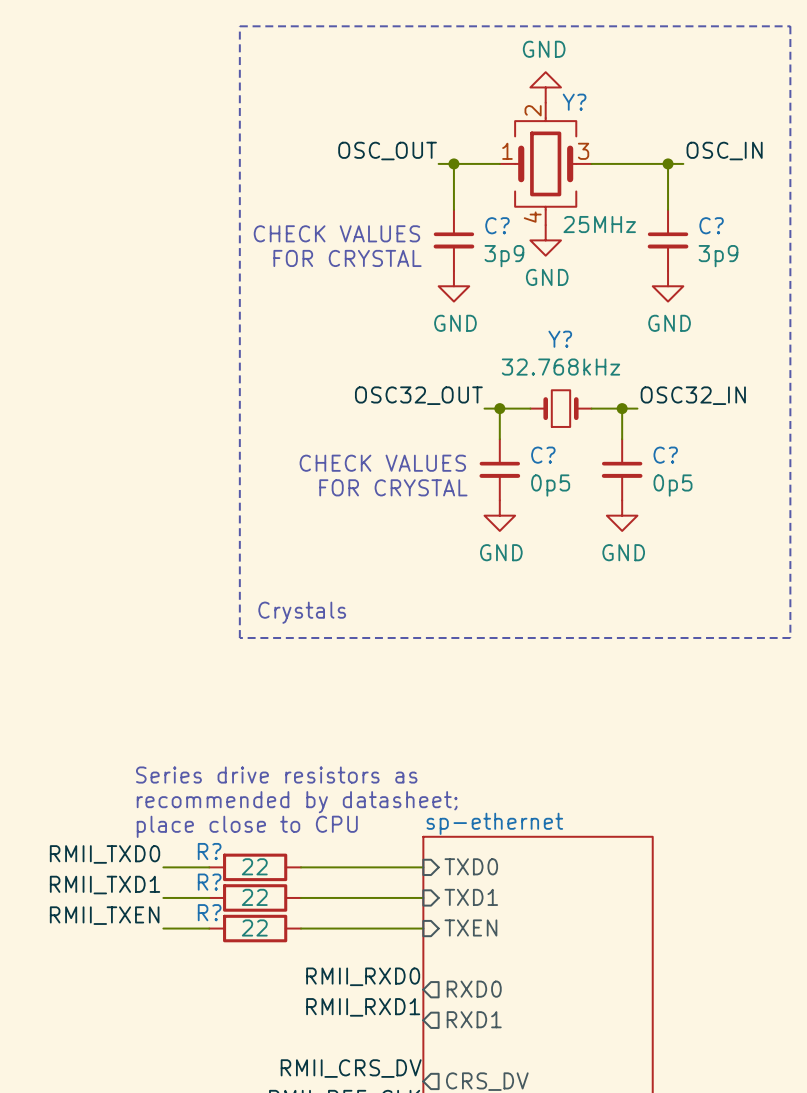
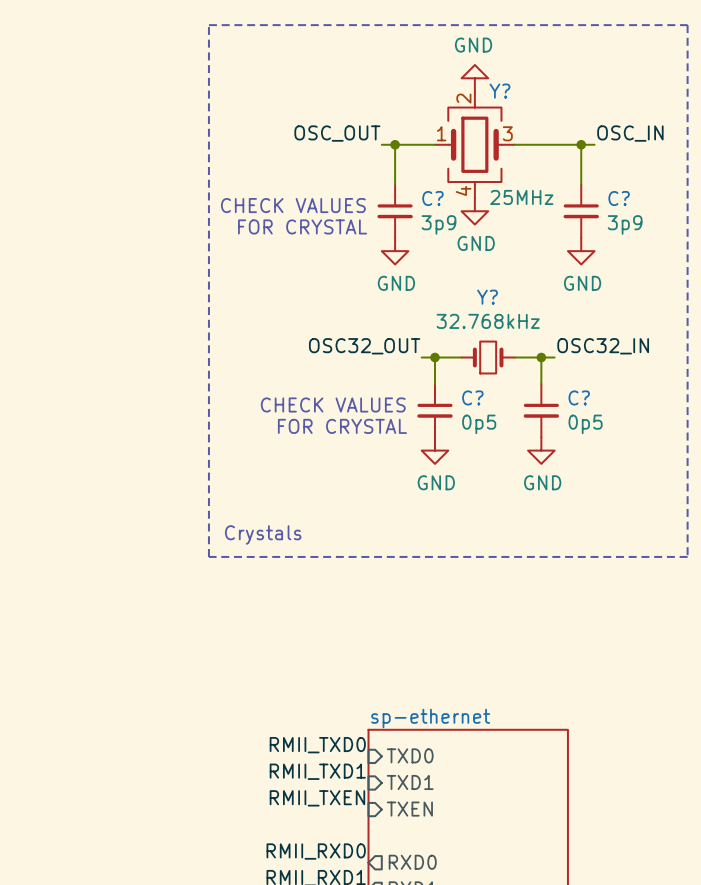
text: Series drive resistors as (276, 775) -> none
text: recommended by datasheet; (297, 802) -> none
text: place close to CPU (247, 826) -> none
label position: RMII_TXD0 (105, 854) -> RMII_TXD0 (317, 745)
wire: (163, 867) (209, 867) -> none
R?: 22 (255, 867) -> none
wire: (301, 867) (423, 867) -> none
label position: RMII_TXD1 (105, 885) -> RMII_TXD1 (317, 771)
wire: (163, 897) (209, 897) -> none
R?: 22 (255, 897) -> none
wire: (301, 897) (423, 897) -> none
label position: RMII_TXEN (104, 915) -> RMII_TXEN (317, 798)
wire: (163, 928) (209, 928) -> none
R?: 22 (255, 928) -> none
wire: (301, 928) (423, 928) -> none

